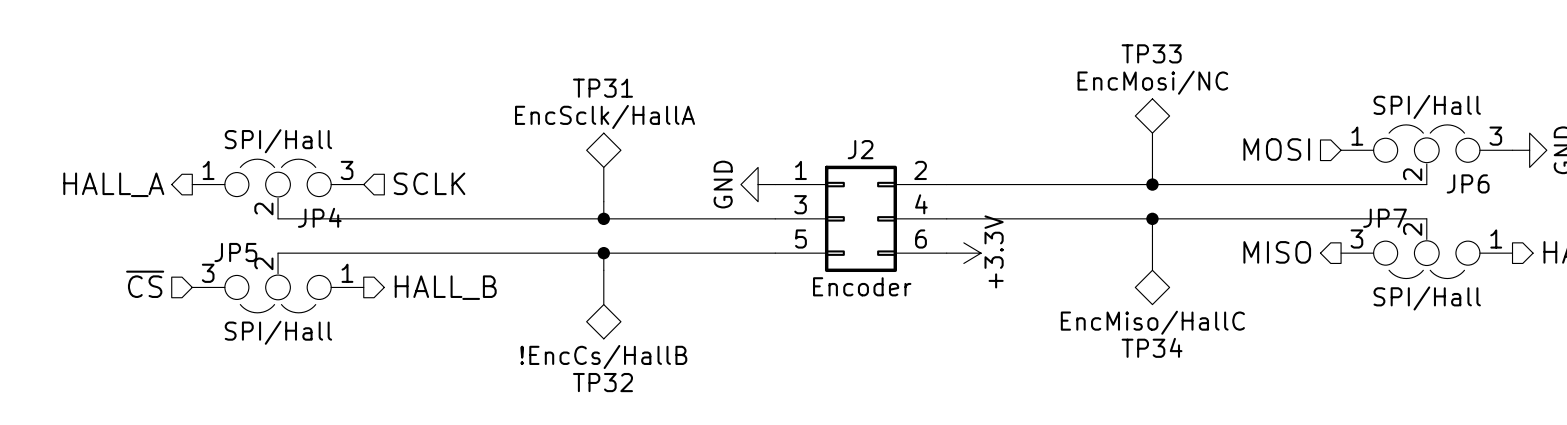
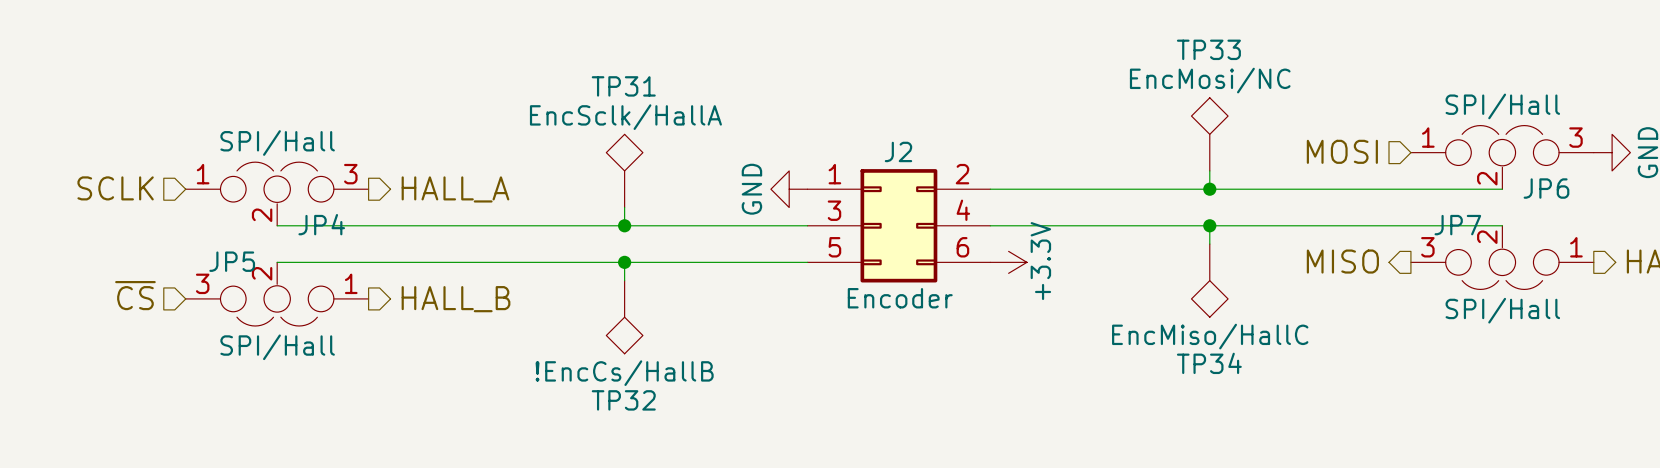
hierarchical label shape: input (429, 183) -> output (455, 189)
hierarchical label: SCLK (429, 183) -> HALL_A (455, 189)
hierarchical label shape: output (113, 184) -> input (115, 188)
hierarchical label: HALL_A (113, 184) -> SCLK (115, 188)

